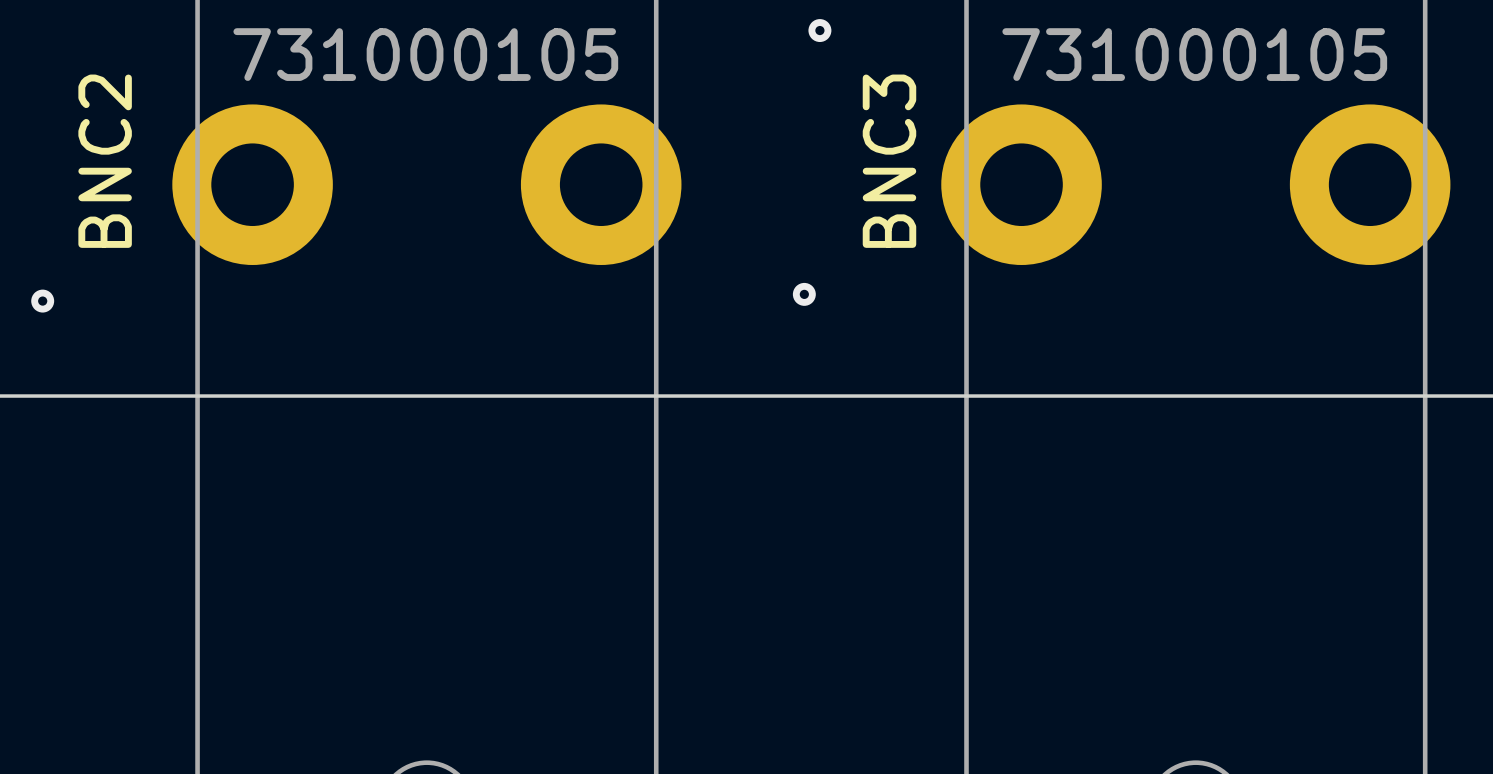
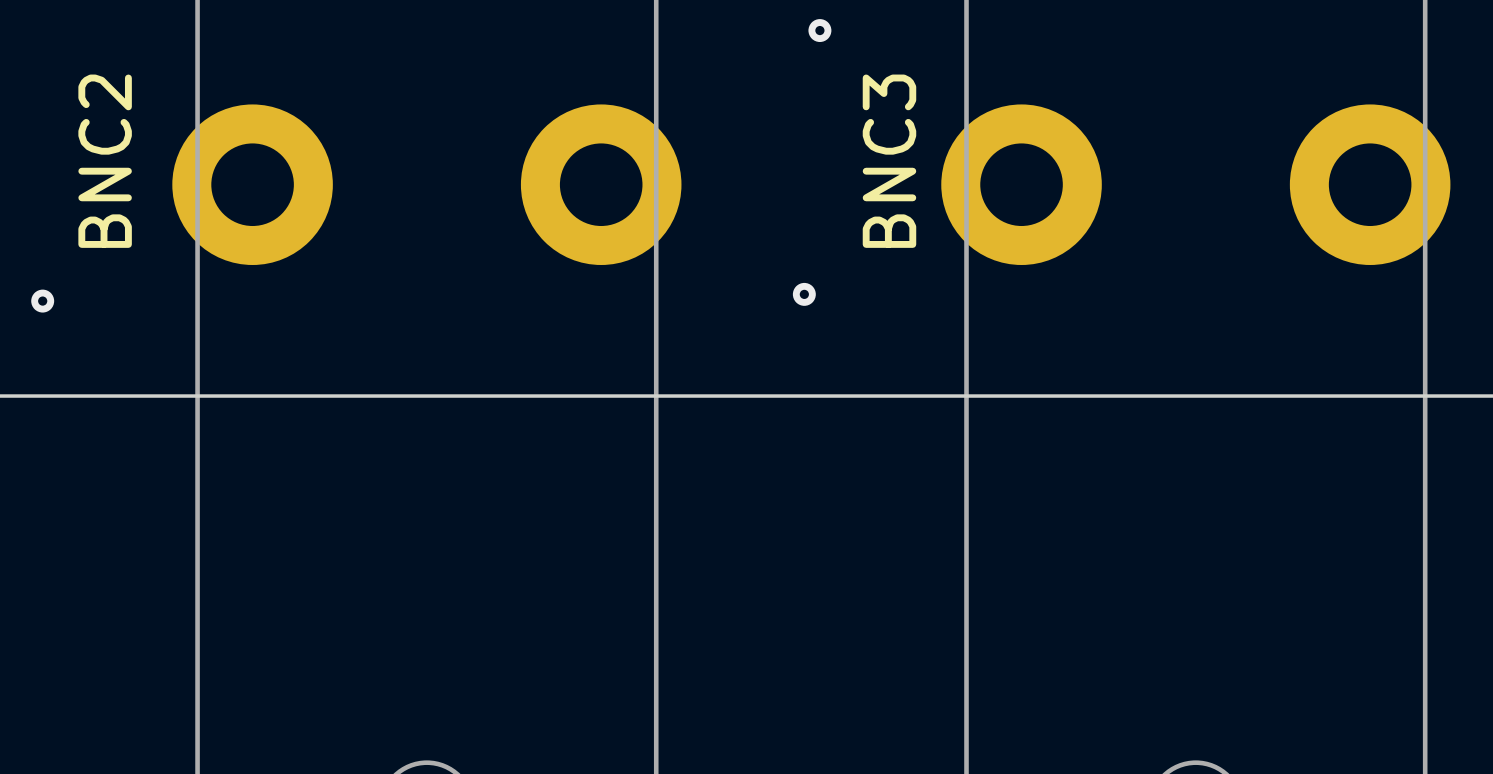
BNC2 value: 731000105 (425, 54) -> none
BNC3 value: 731000105 (1194, 54) -> none

